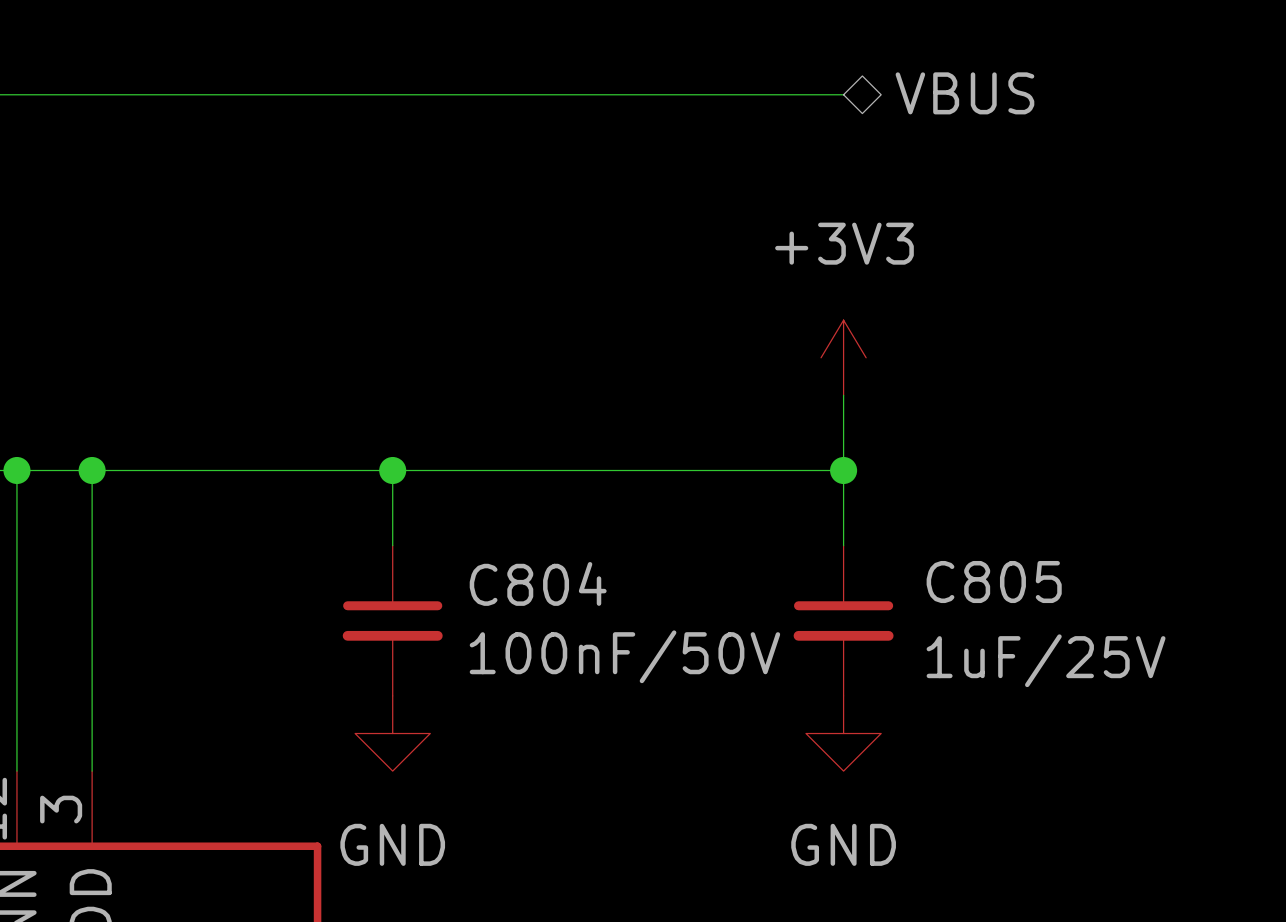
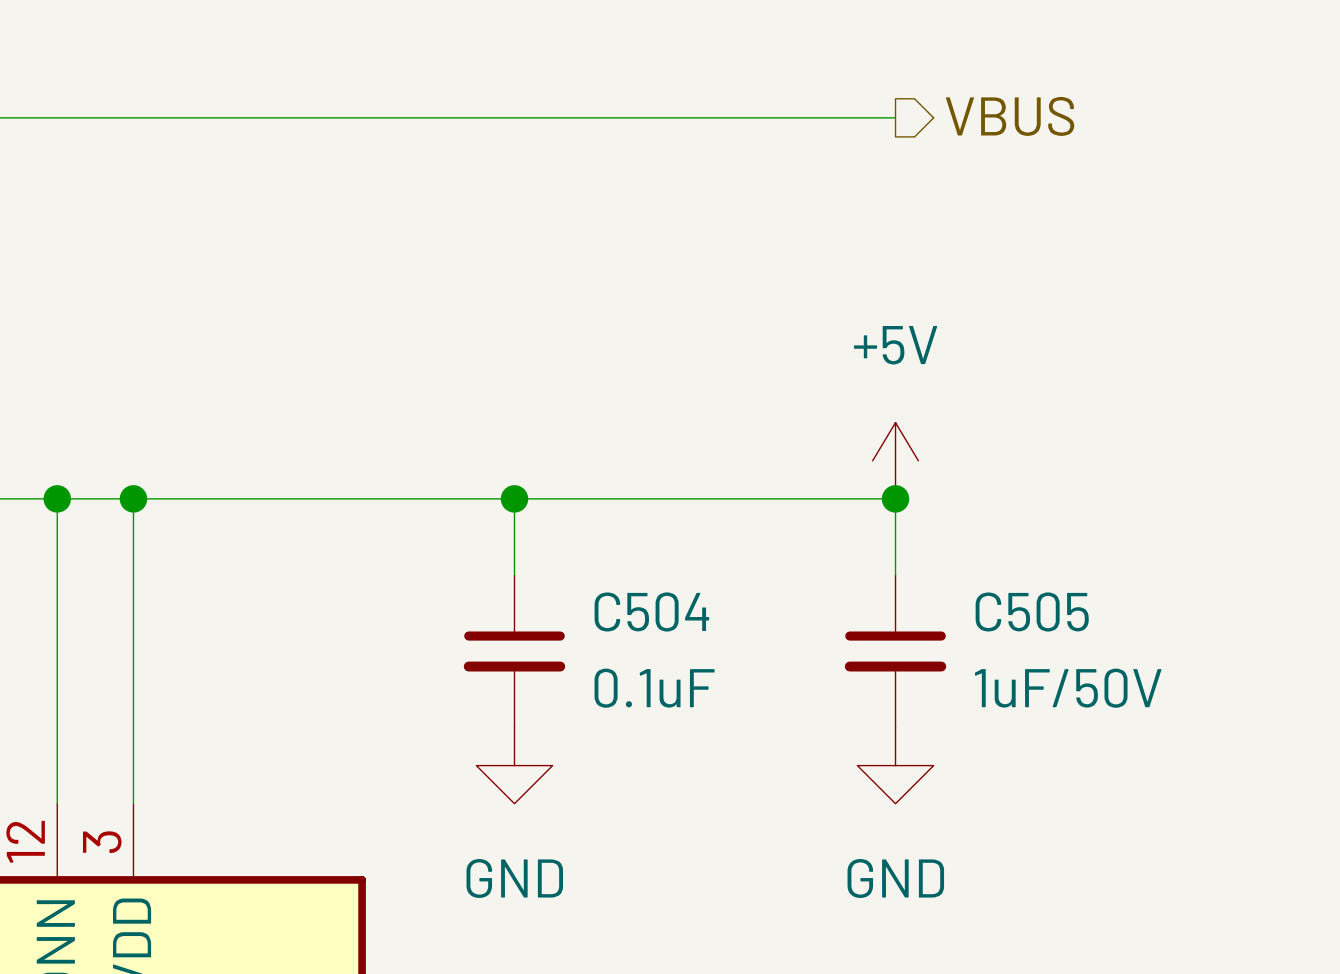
hierarchical label shape: bidirectional (964, 93) -> output (1010, 116)
power symbol: +3V3 (843, 357) -> none
power symbol: none -> +5V (895, 460)
wire: (392, 470) (392, 545) -> (514, 498) (514, 575)
junction position: (392, 470) -> (514, 498)
C805 name: C805 (994, 582) -> C505 (1032, 611)
C804: 100nF/50V (392, 620) -> none
C504: none -> 0.1uF (514, 651)
C805 value: 1uF/25V (1046, 660) -> 1uF/50V (1068, 688)
power symbol position: GND (392, 733) -> GND (514, 765)

